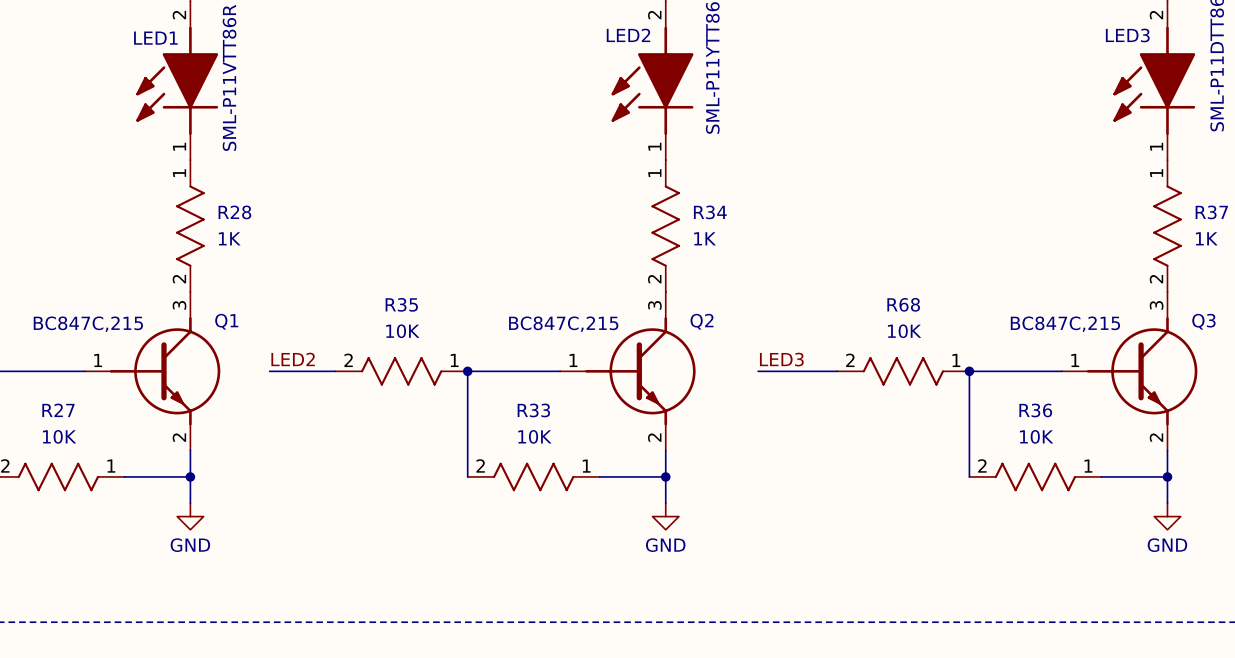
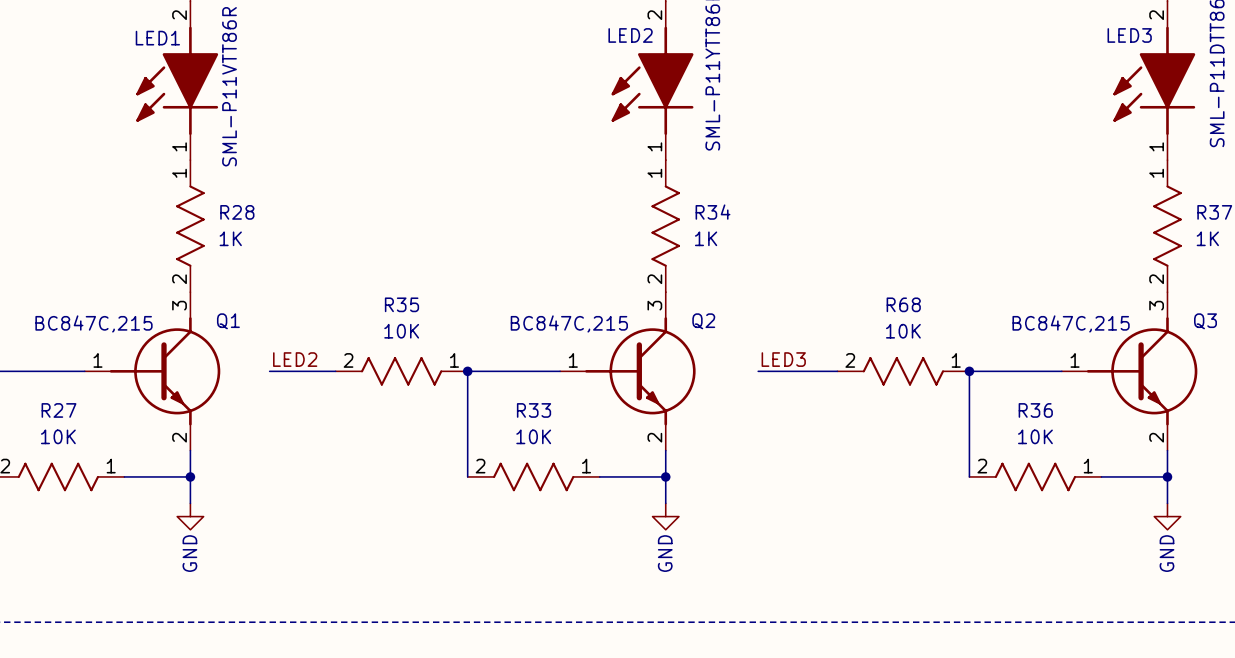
power symbol text rotation: 0° (190, 545) -> 90° counterclockwise (189, 553)
power symbol text rotation: 0° (665, 545) -> 90° counterclockwise (665, 553)
power symbol text rotation: 0° (1167, 545) -> 90° counterclockwise (1166, 553)

